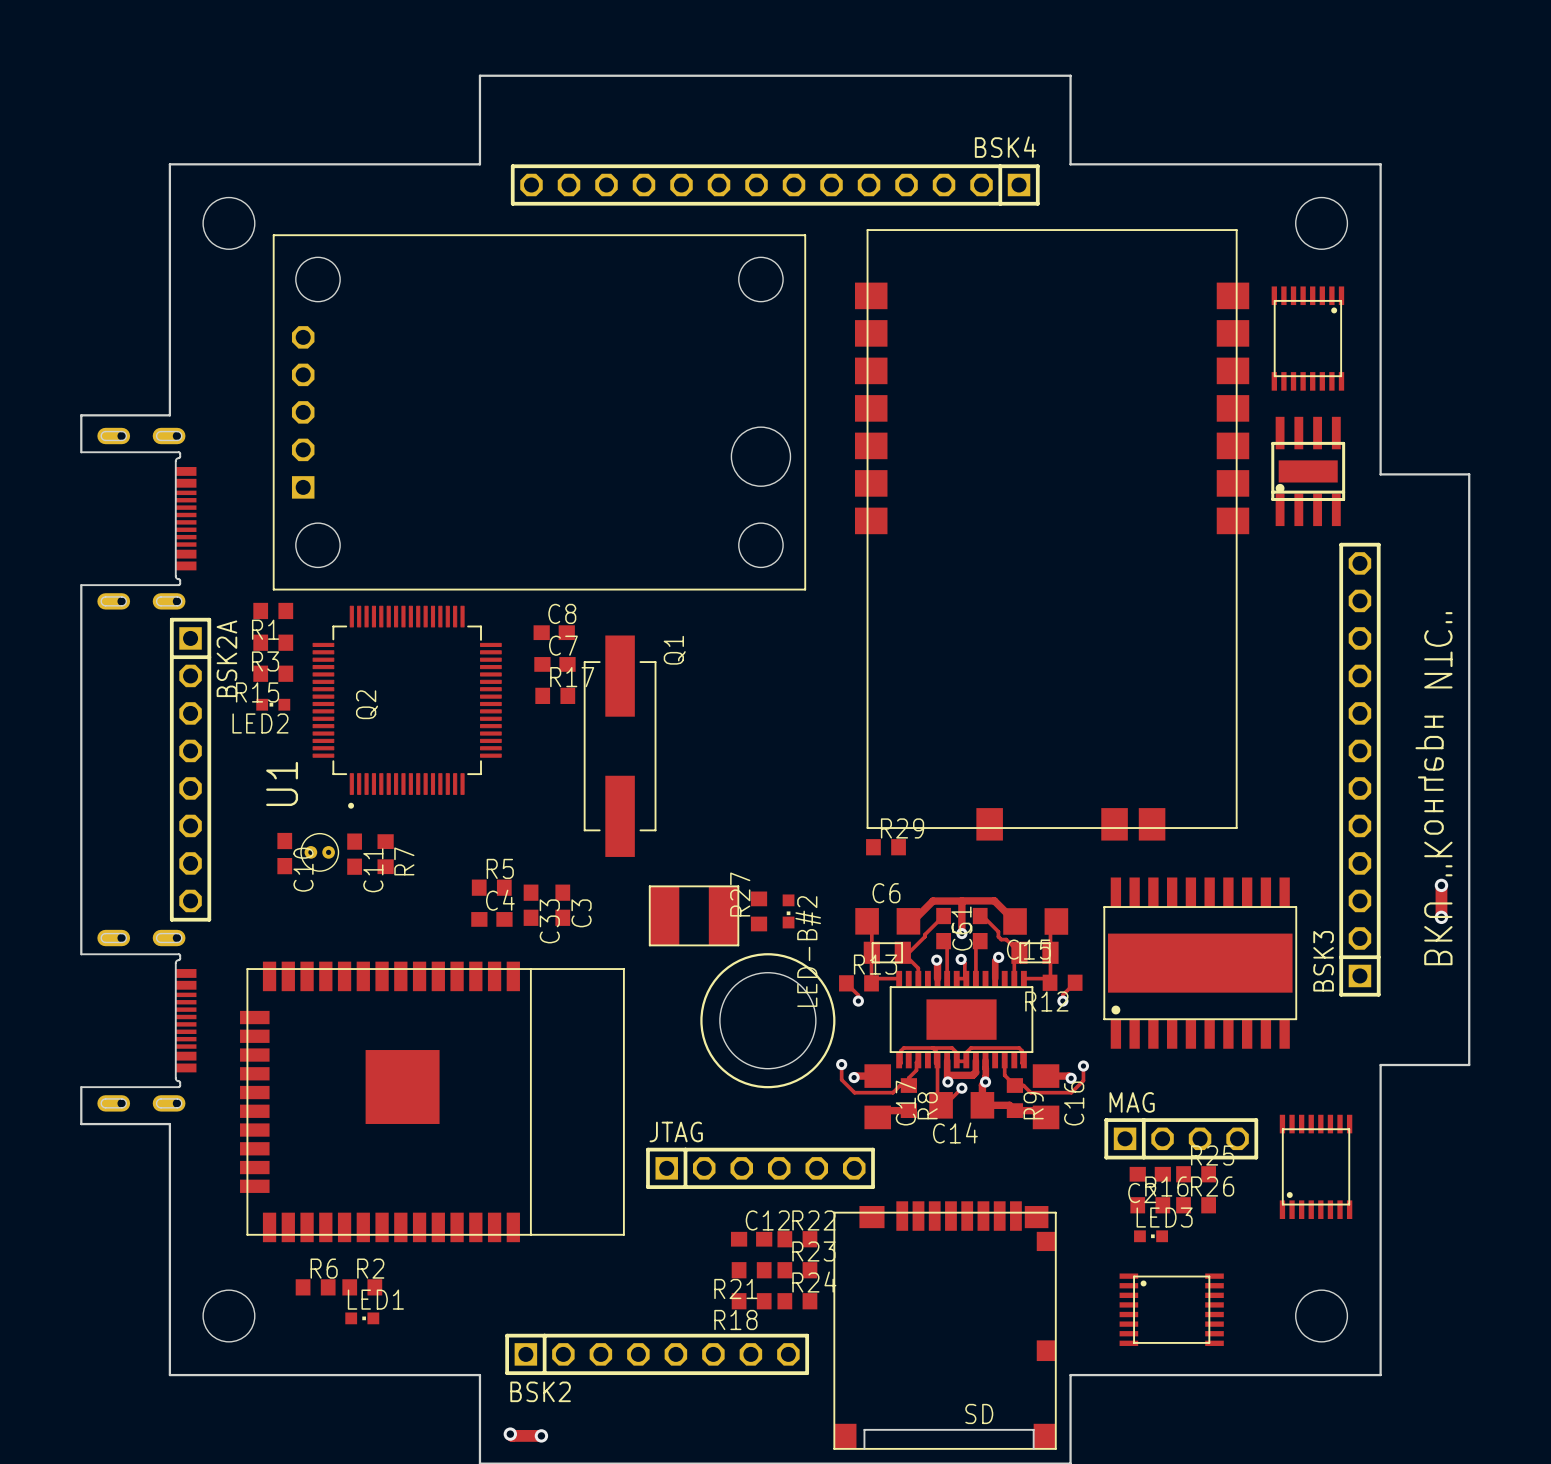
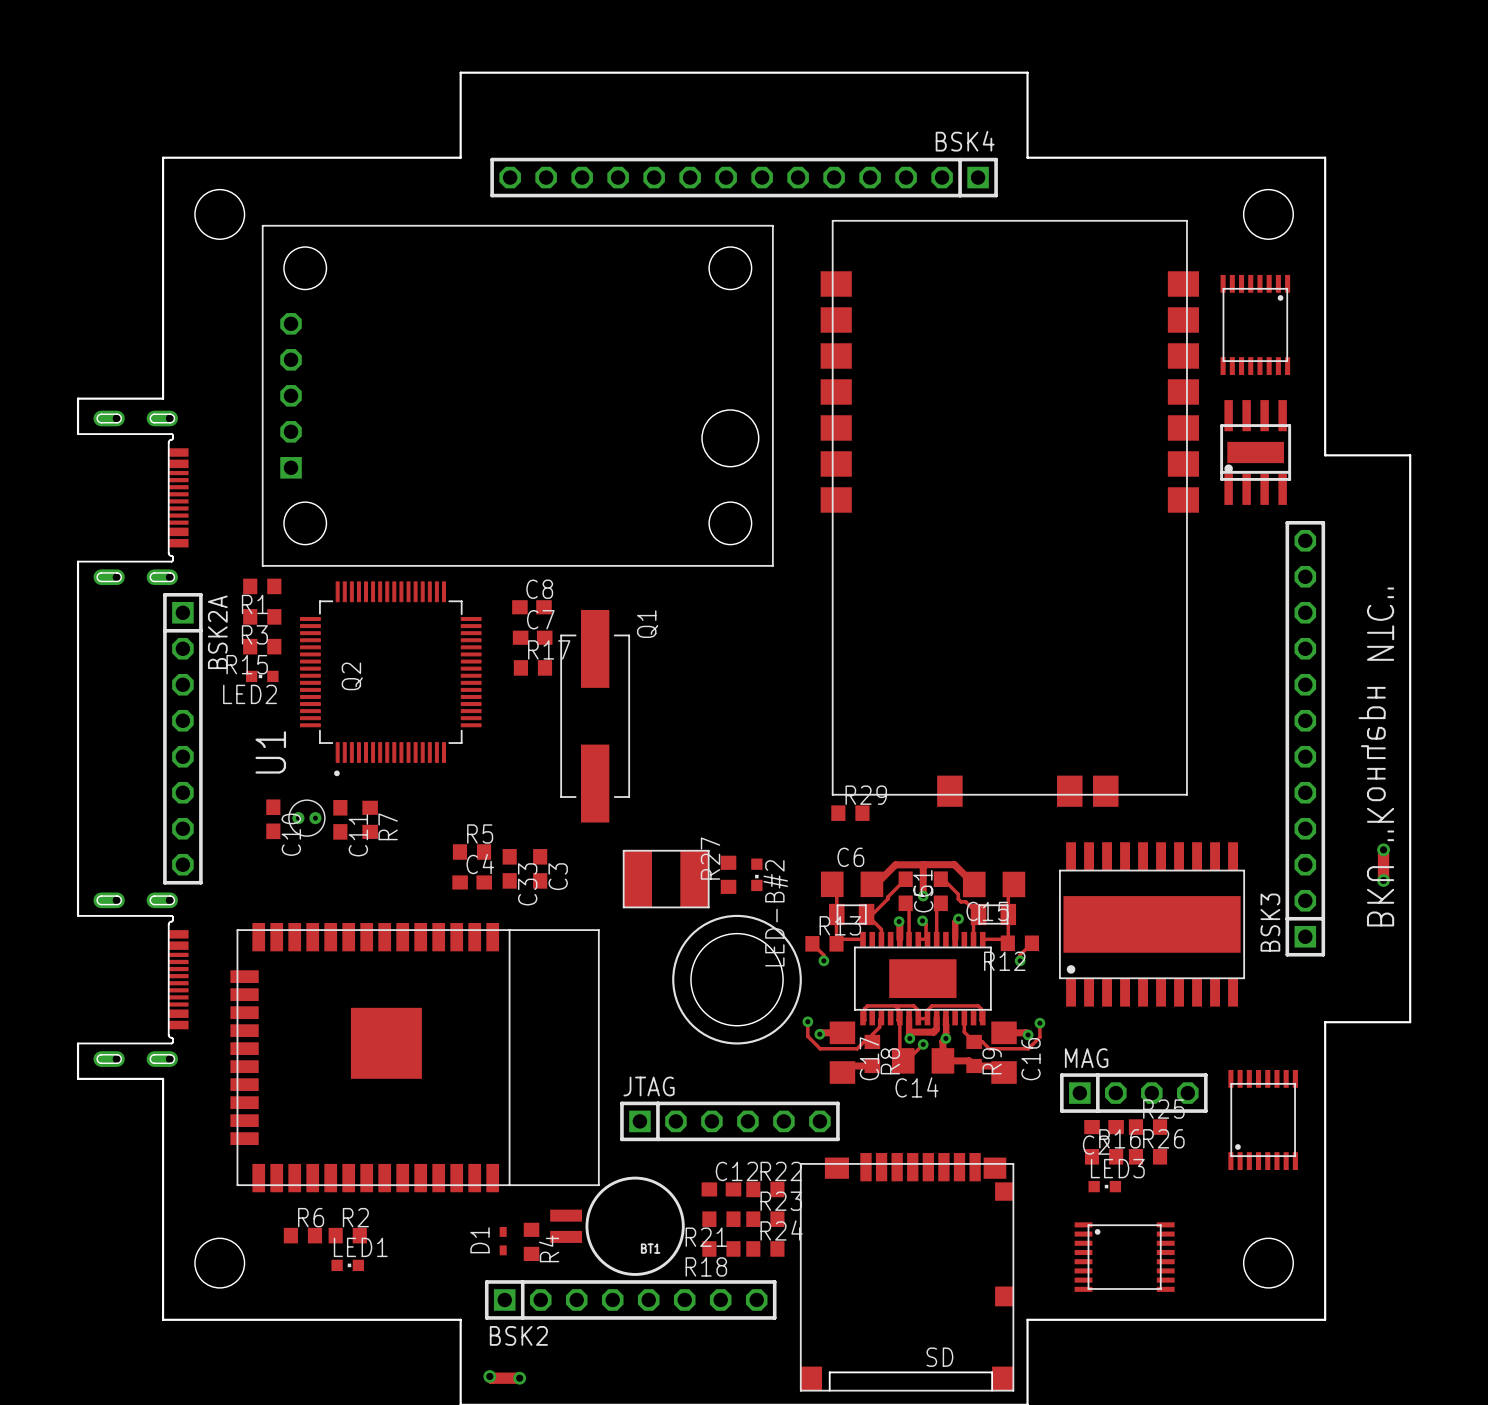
BT1: none -> (617, 1226)
D1: none -> (503, 1241)
R4: none -> (531, 1241)

